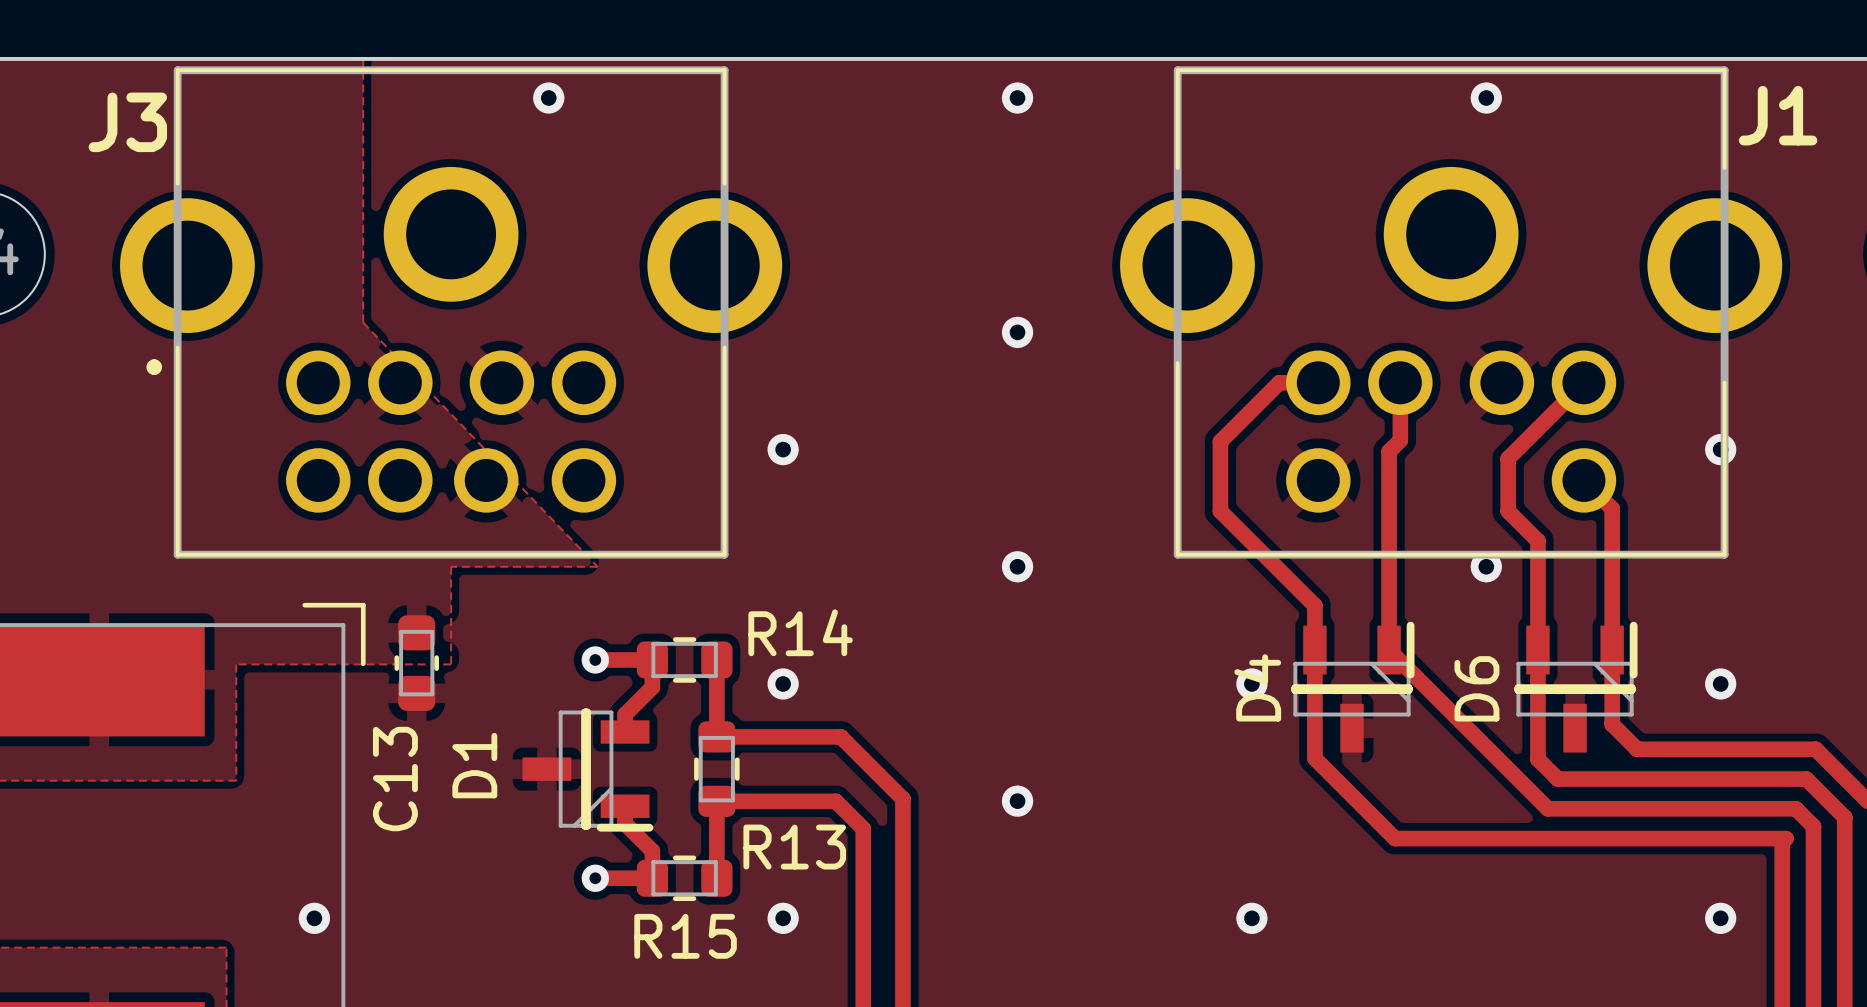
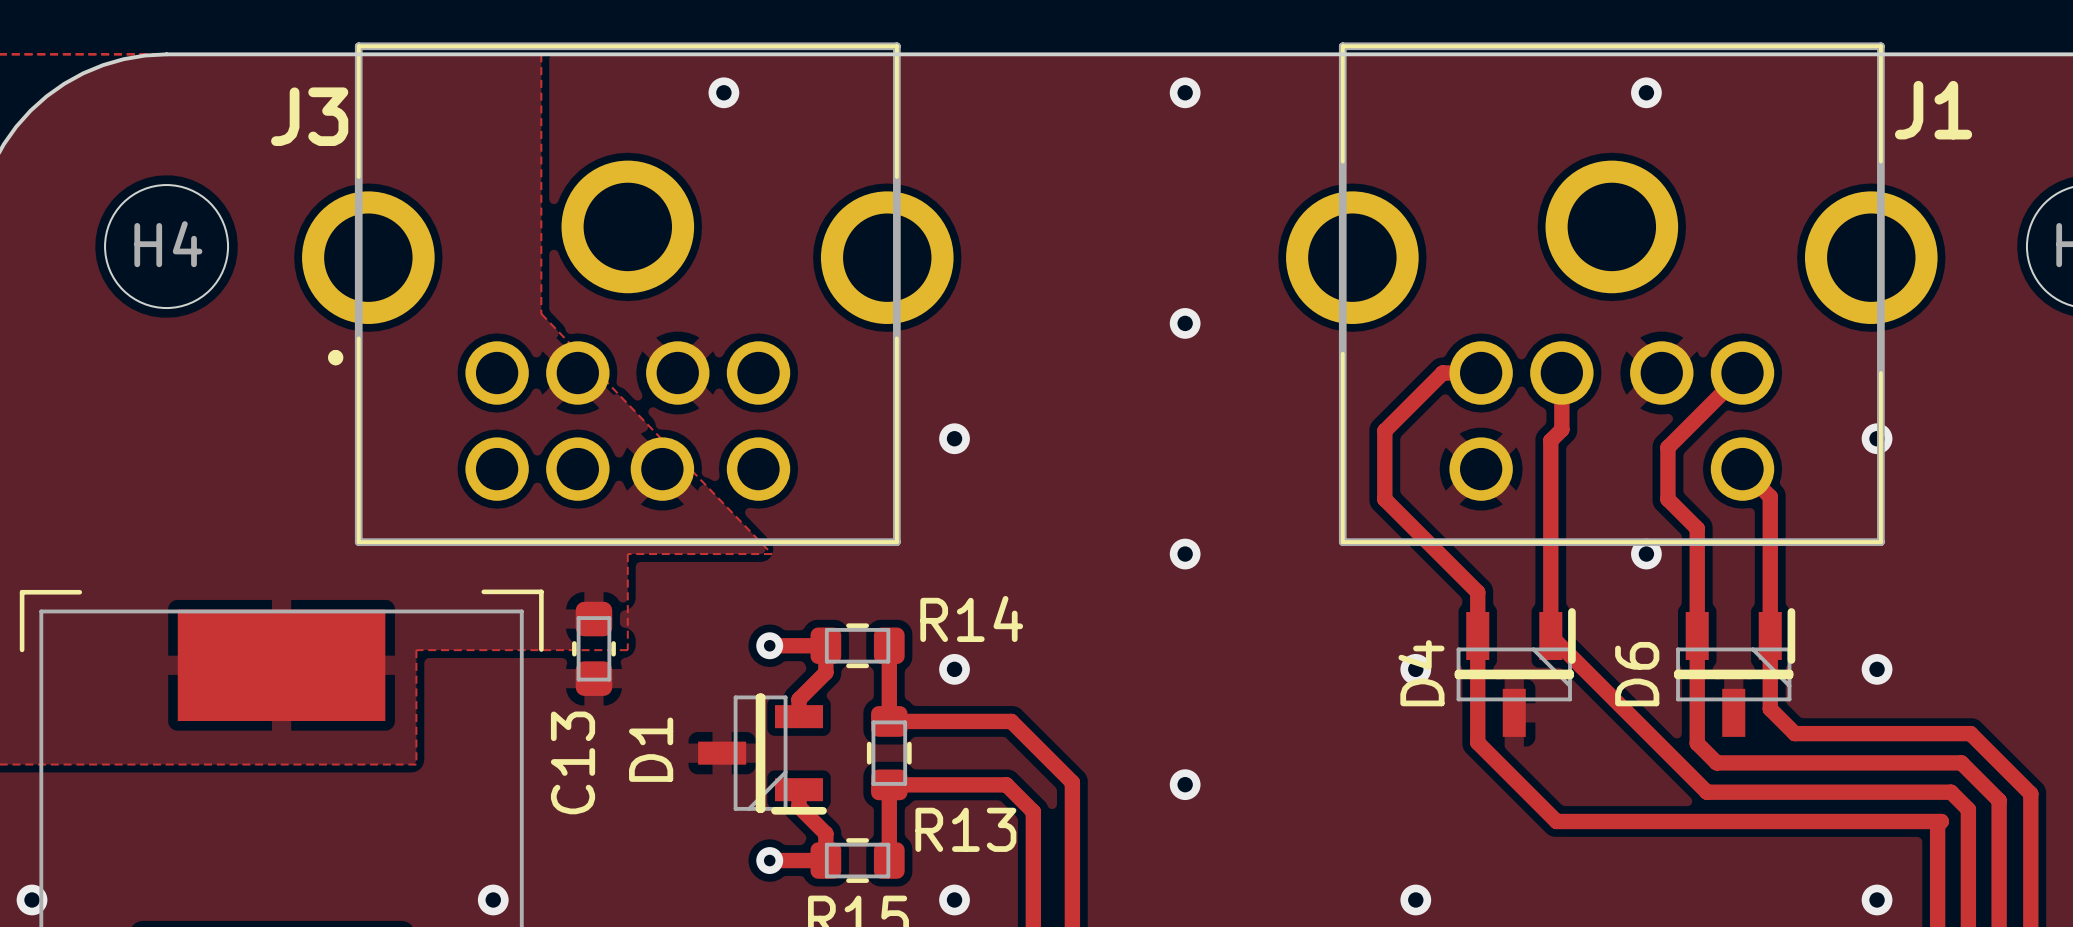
J3 footprint: [120, 66, 783, 559] -> [302, 42, 954, 546]
J1 footprint: [1120, 66, 1783, 559] -> [1286, 42, 1938, 546]

